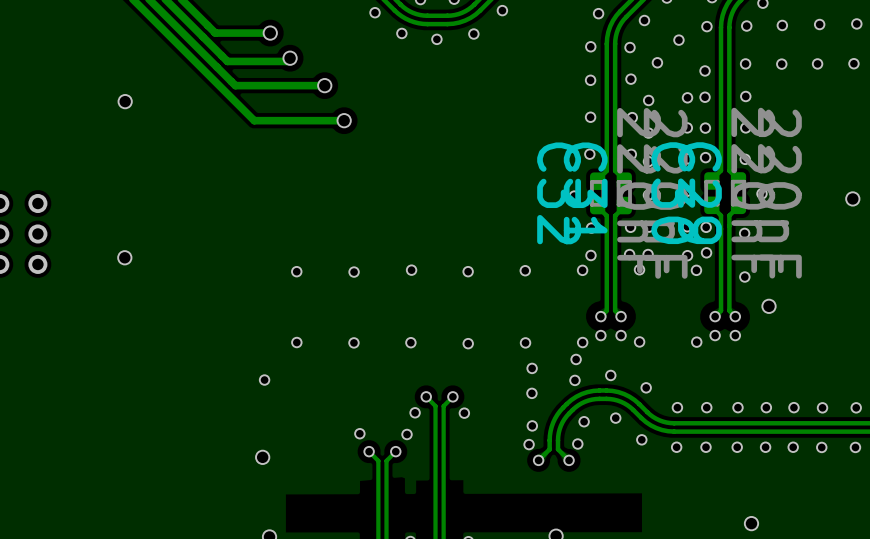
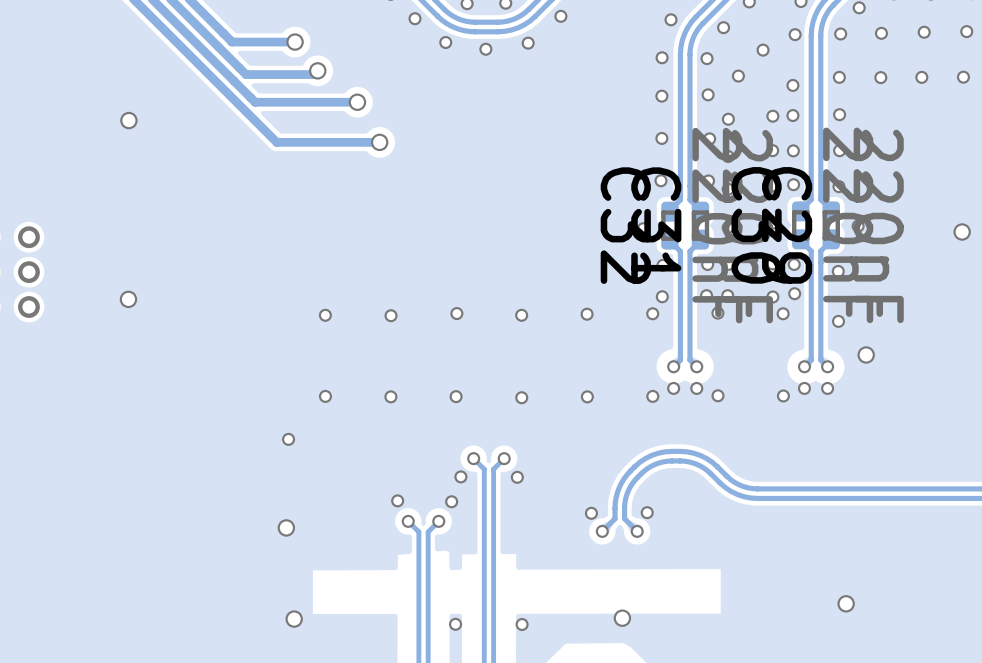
via: (576, 359) -> none
via: (532, 368) -> none
via: (610, 375) -> none
via: (574, 380) -> none
via: (646, 387) -> none
via: (531, 393) -> none
via: (677, 407) -> none
via: (706, 407) -> none
via: (737, 407) -> none
via: (766, 407) -> none
via: (793, 407) -> none
via: (822, 407) -> none
via: (856, 407) -> none
via: (615, 418) -> none
via: (584, 421) -> none
via: (532, 425) -> none
via: (641, 439) -> none
via: (676, 447) -> none
via: (705, 447) -> none
via: (737, 447) -> none
via: (765, 447) -> none
via: (793, 447) -> none
via: (821, 447) -> none
via: (855, 447) -> none

